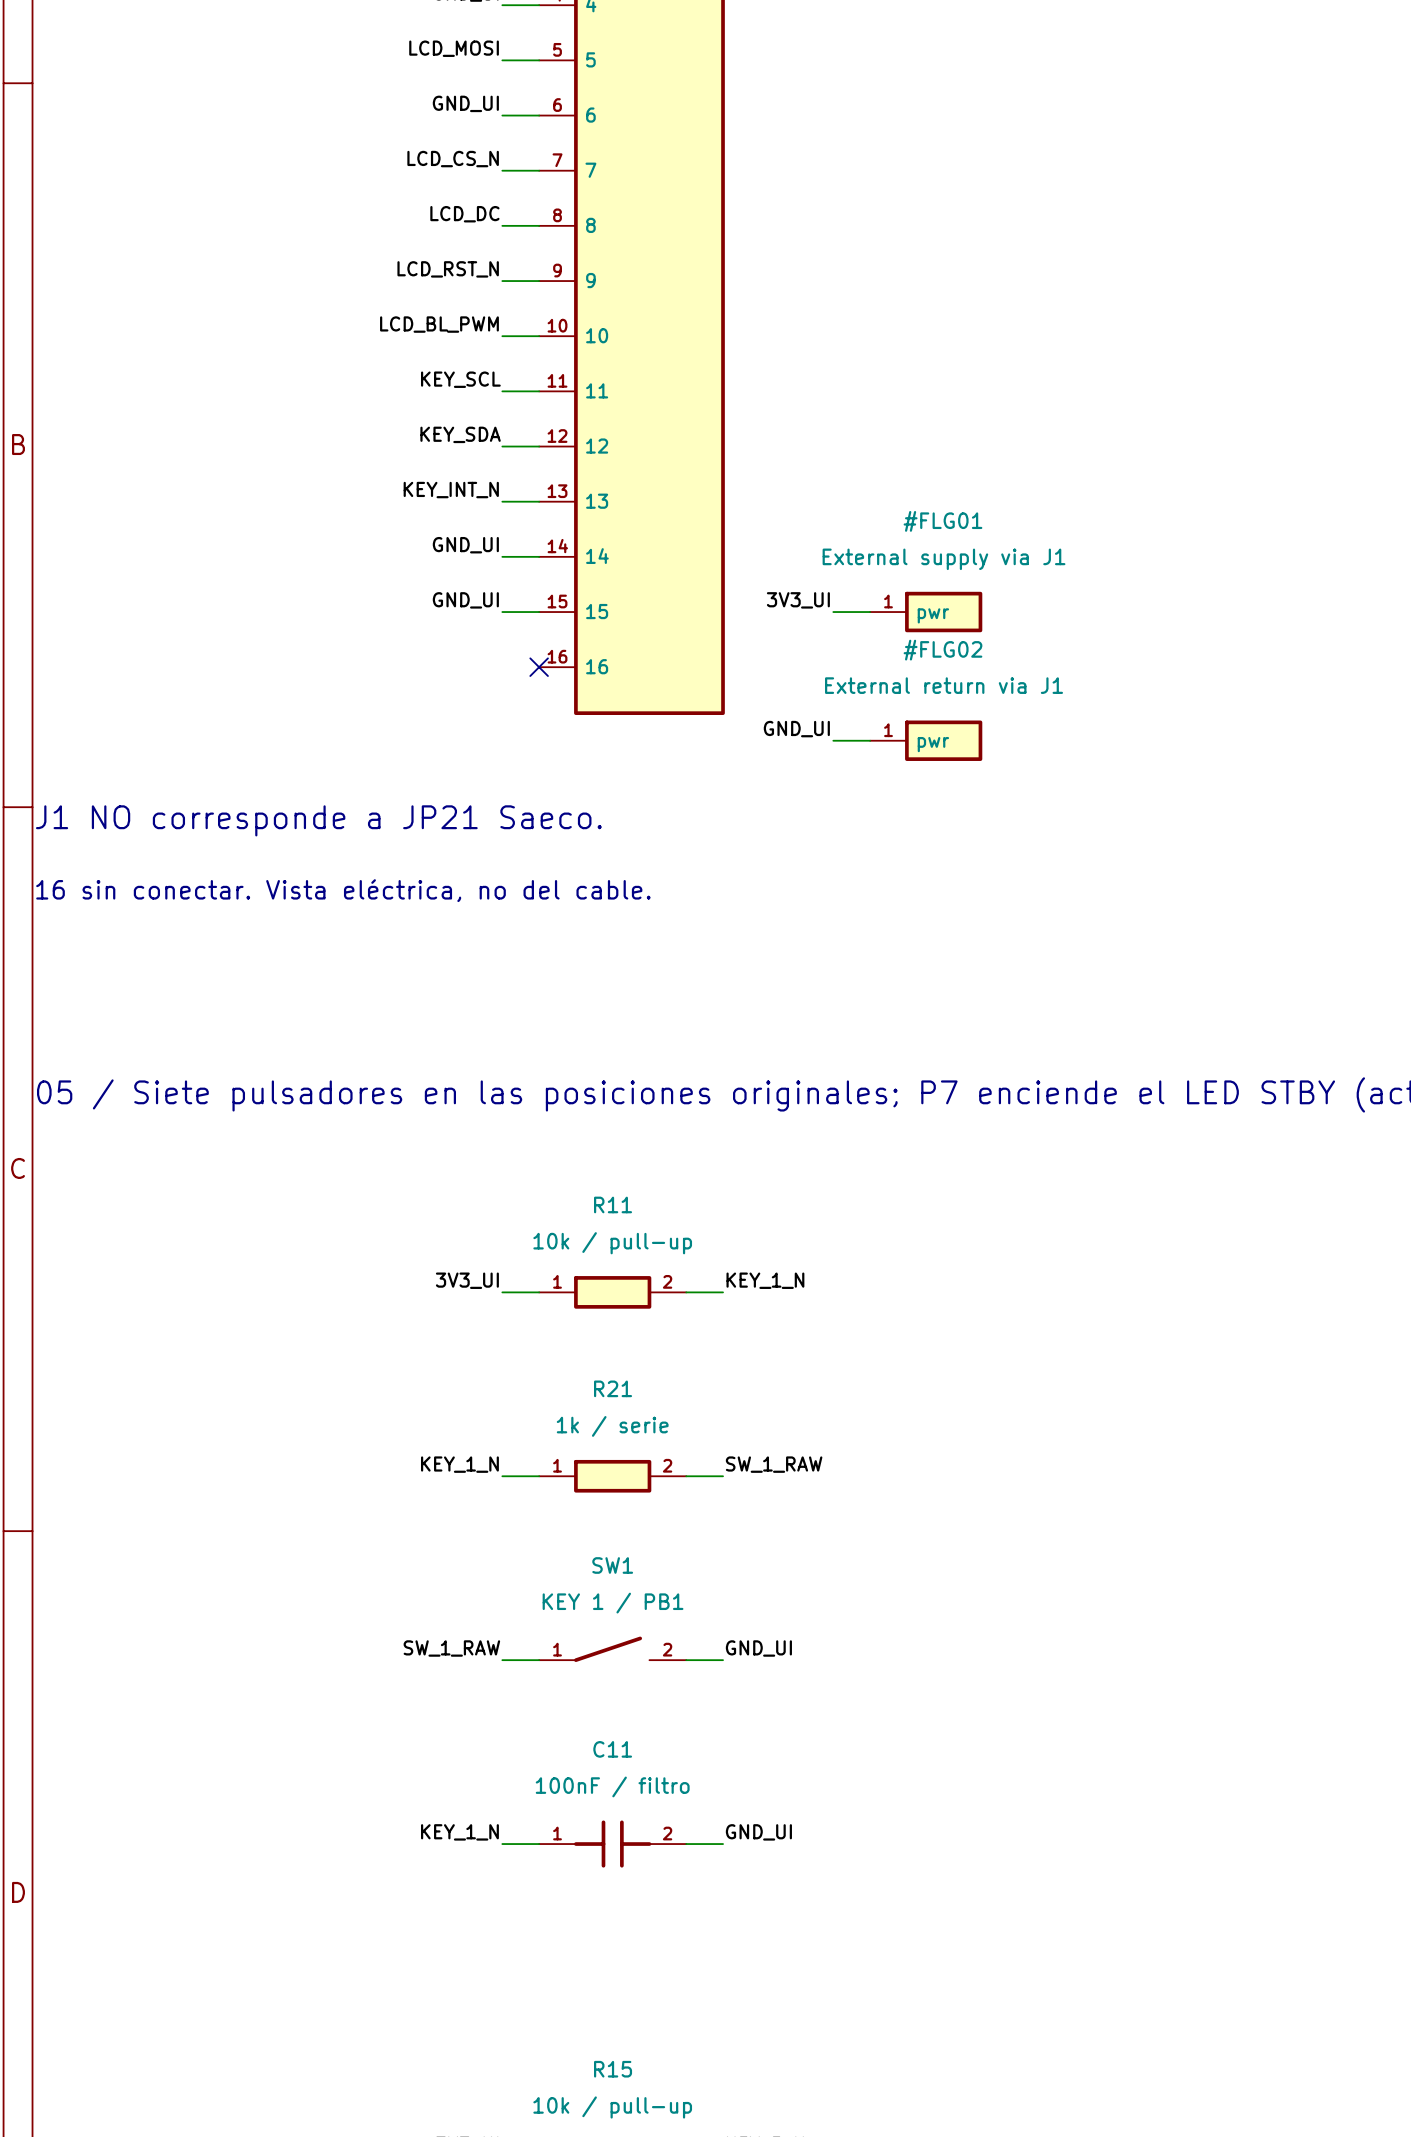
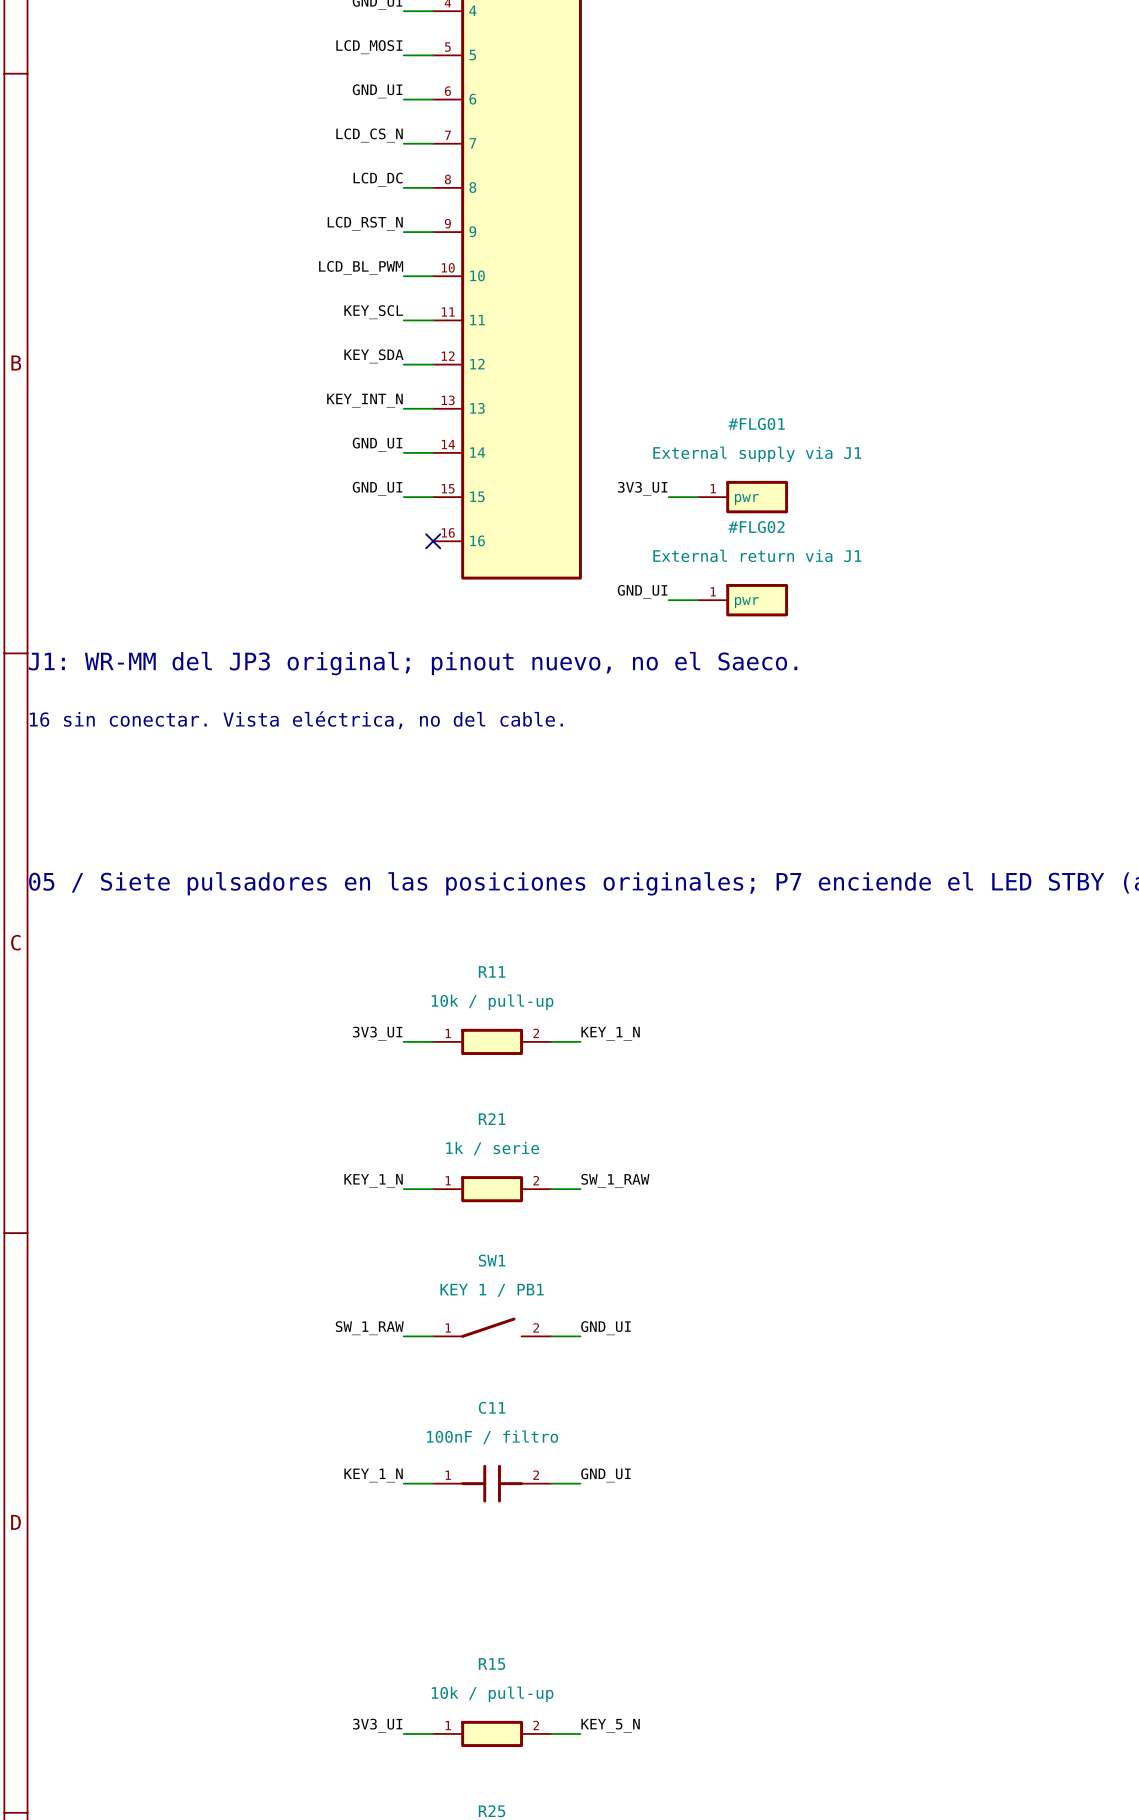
text: J1 NO corresponde a JP21 Saeco. (318, 820) -> J1: WR-MM del JP3 original; pinout nuevo, no el Saeco. (413, 663)

